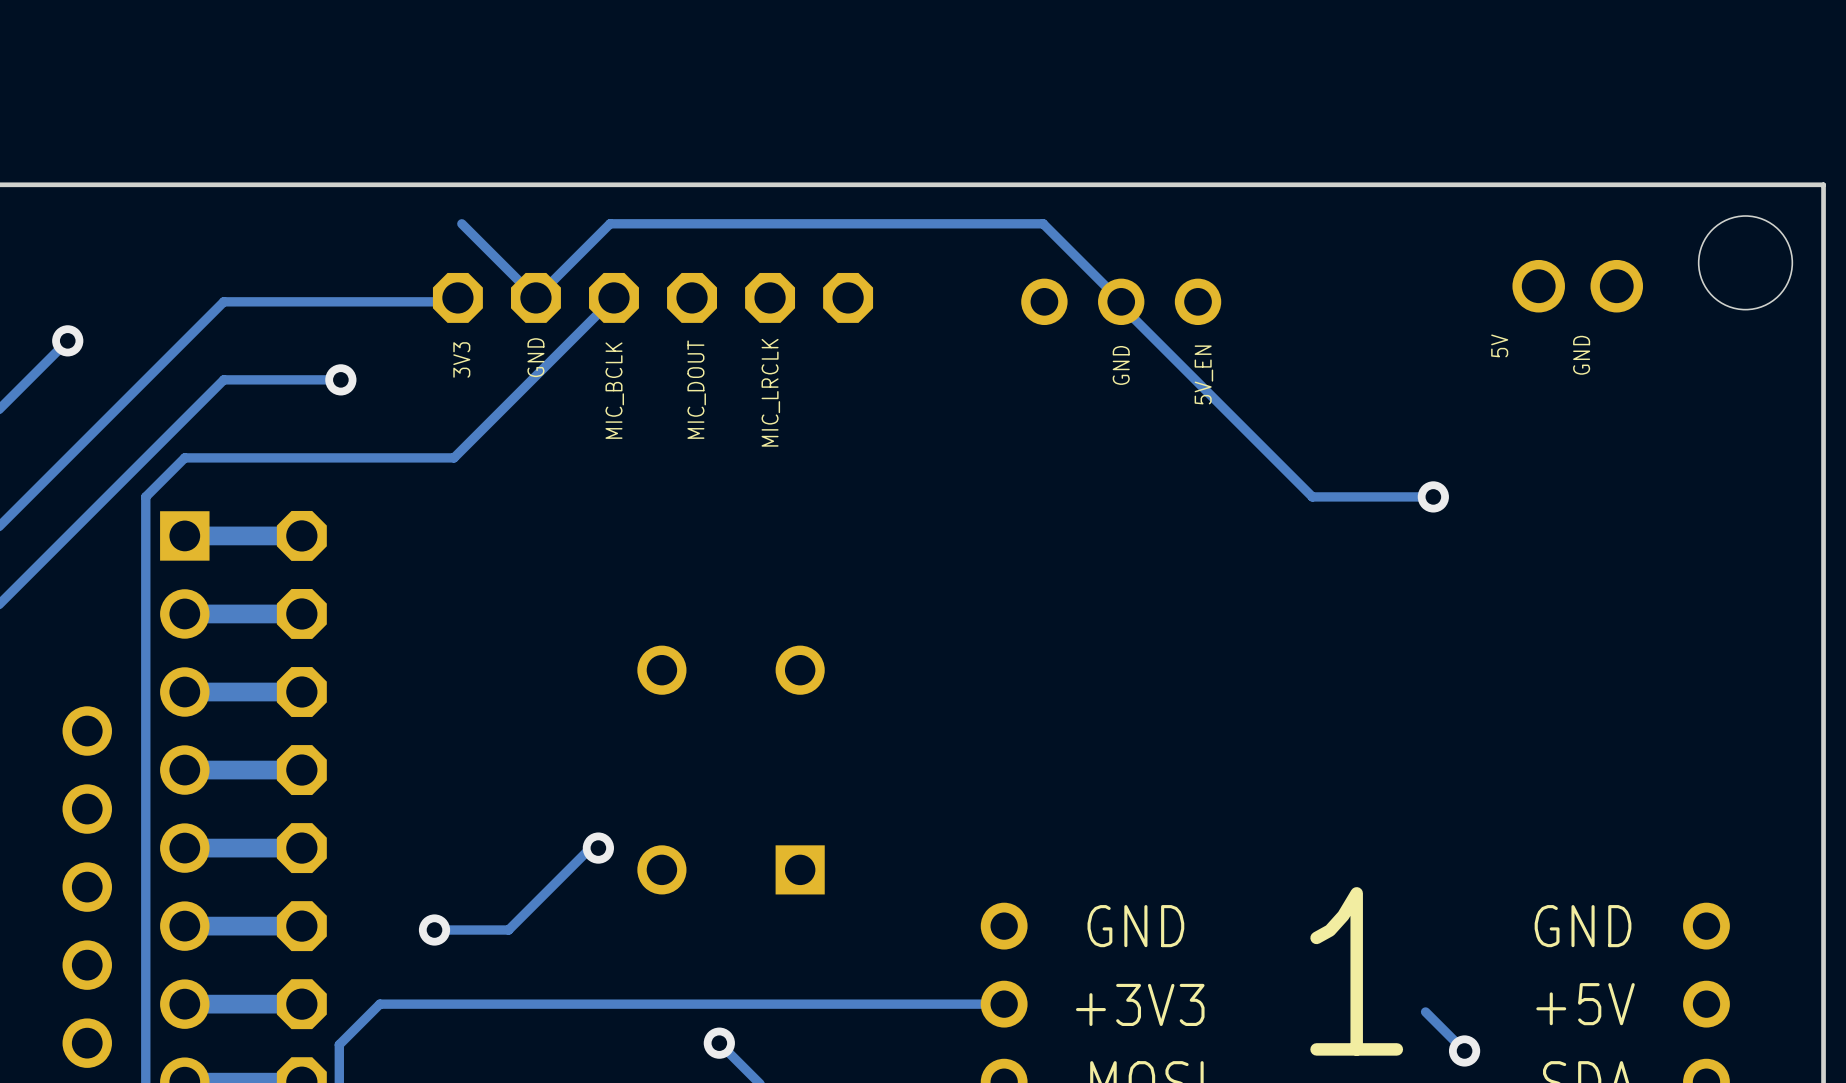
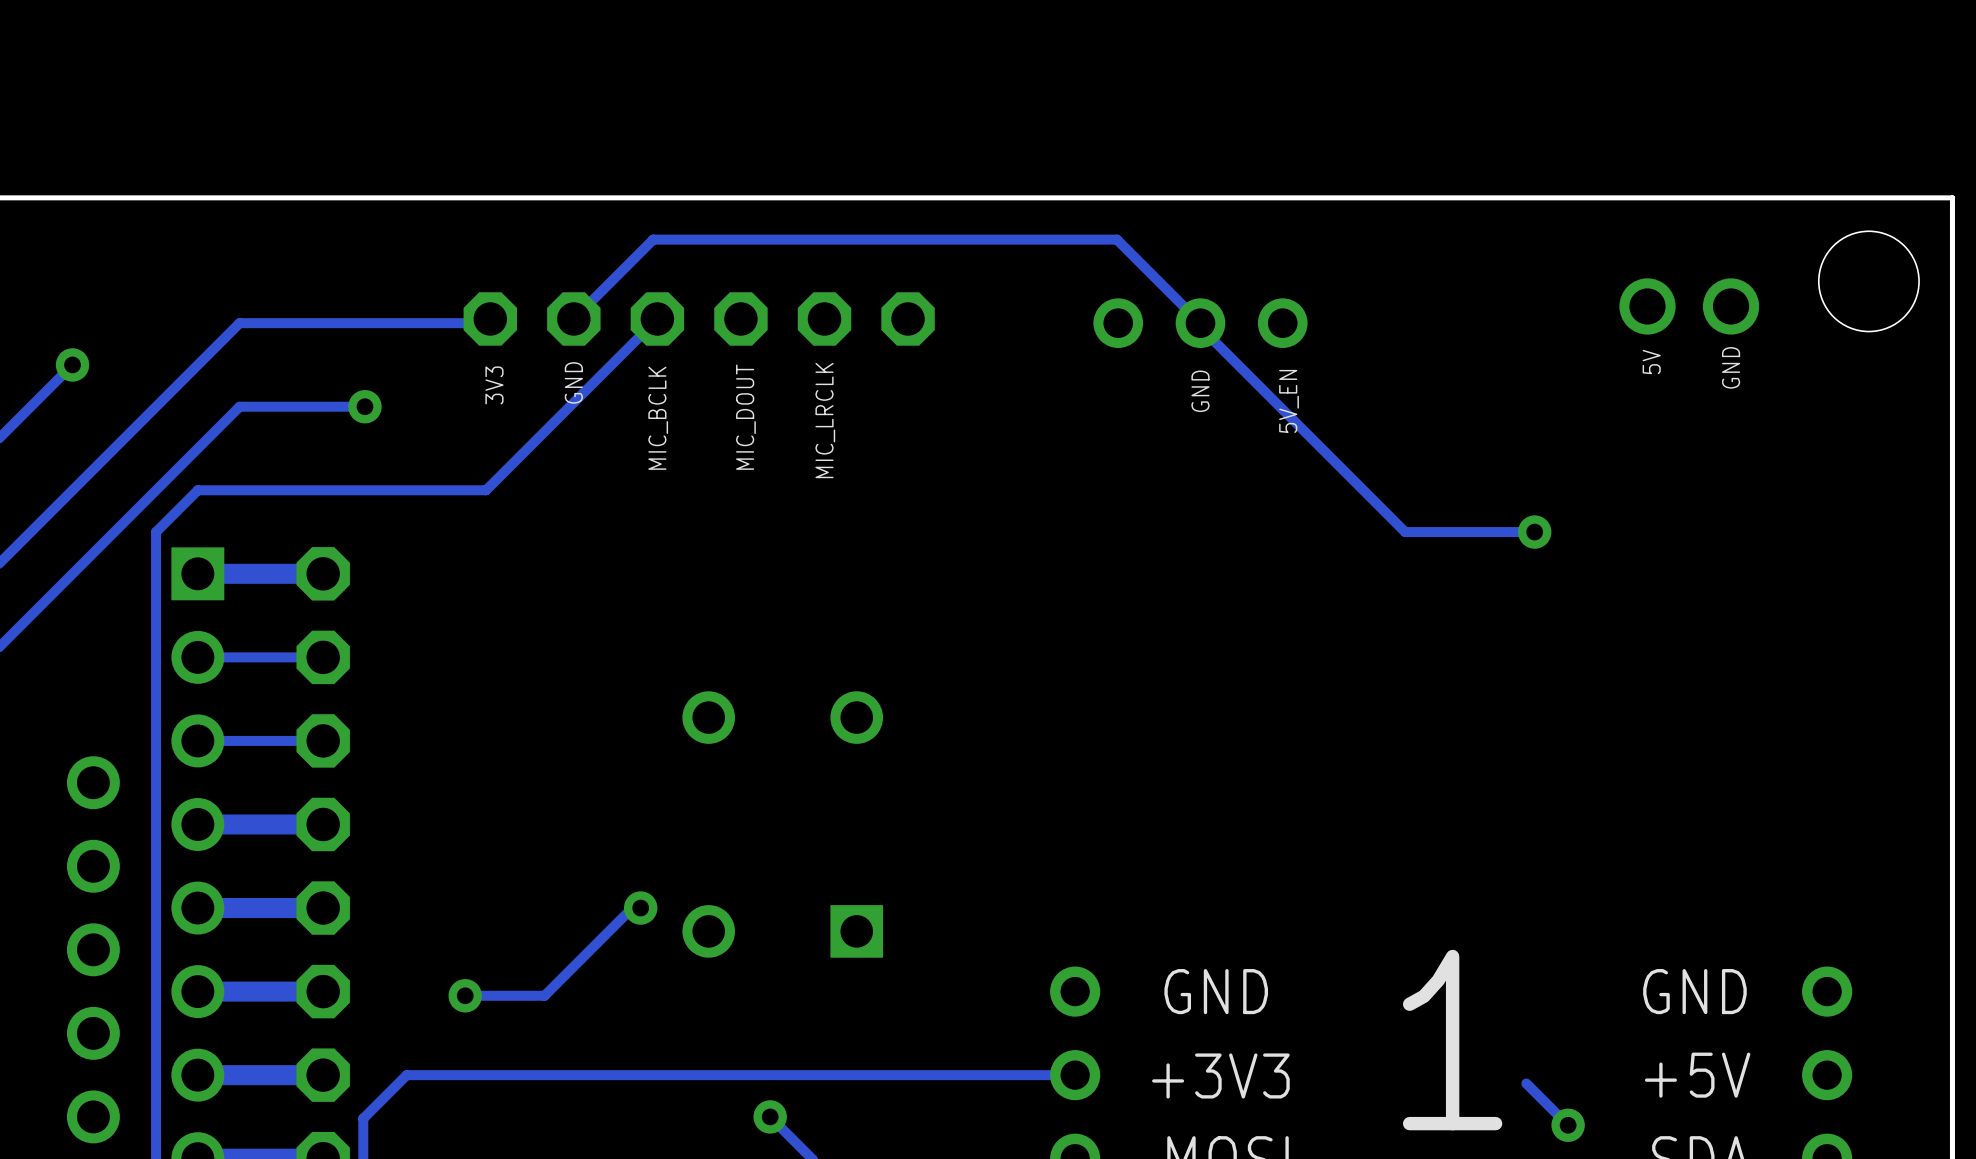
track: (461, 223) (535, 297) -> none
text position: 5V (1499, 345) -> 5V (1651, 362)
text position: GND (1581, 355) -> GND (1731, 367)
track width: thick (301, 613) (184, 613) -> thin (323, 657) (197, 657)
track width: thick (301, 692) (184, 692) -> thin (323, 740) (197, 740)

